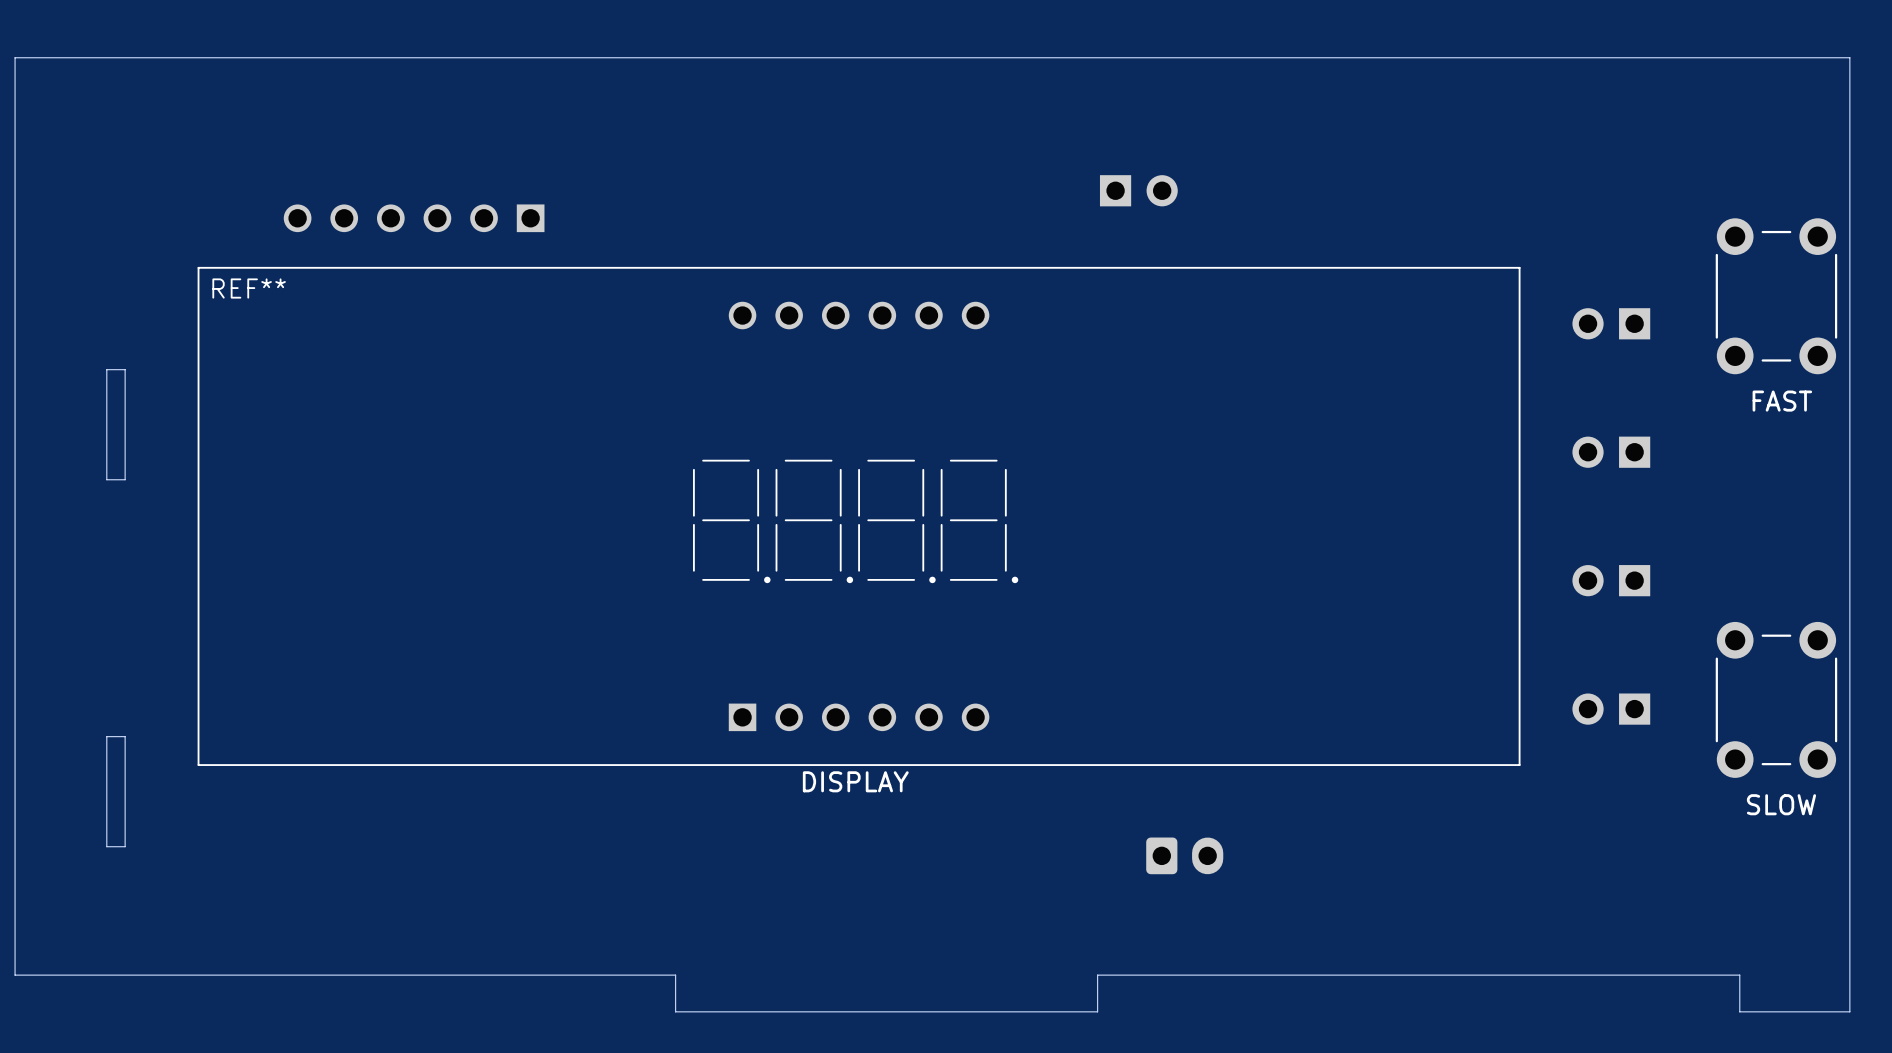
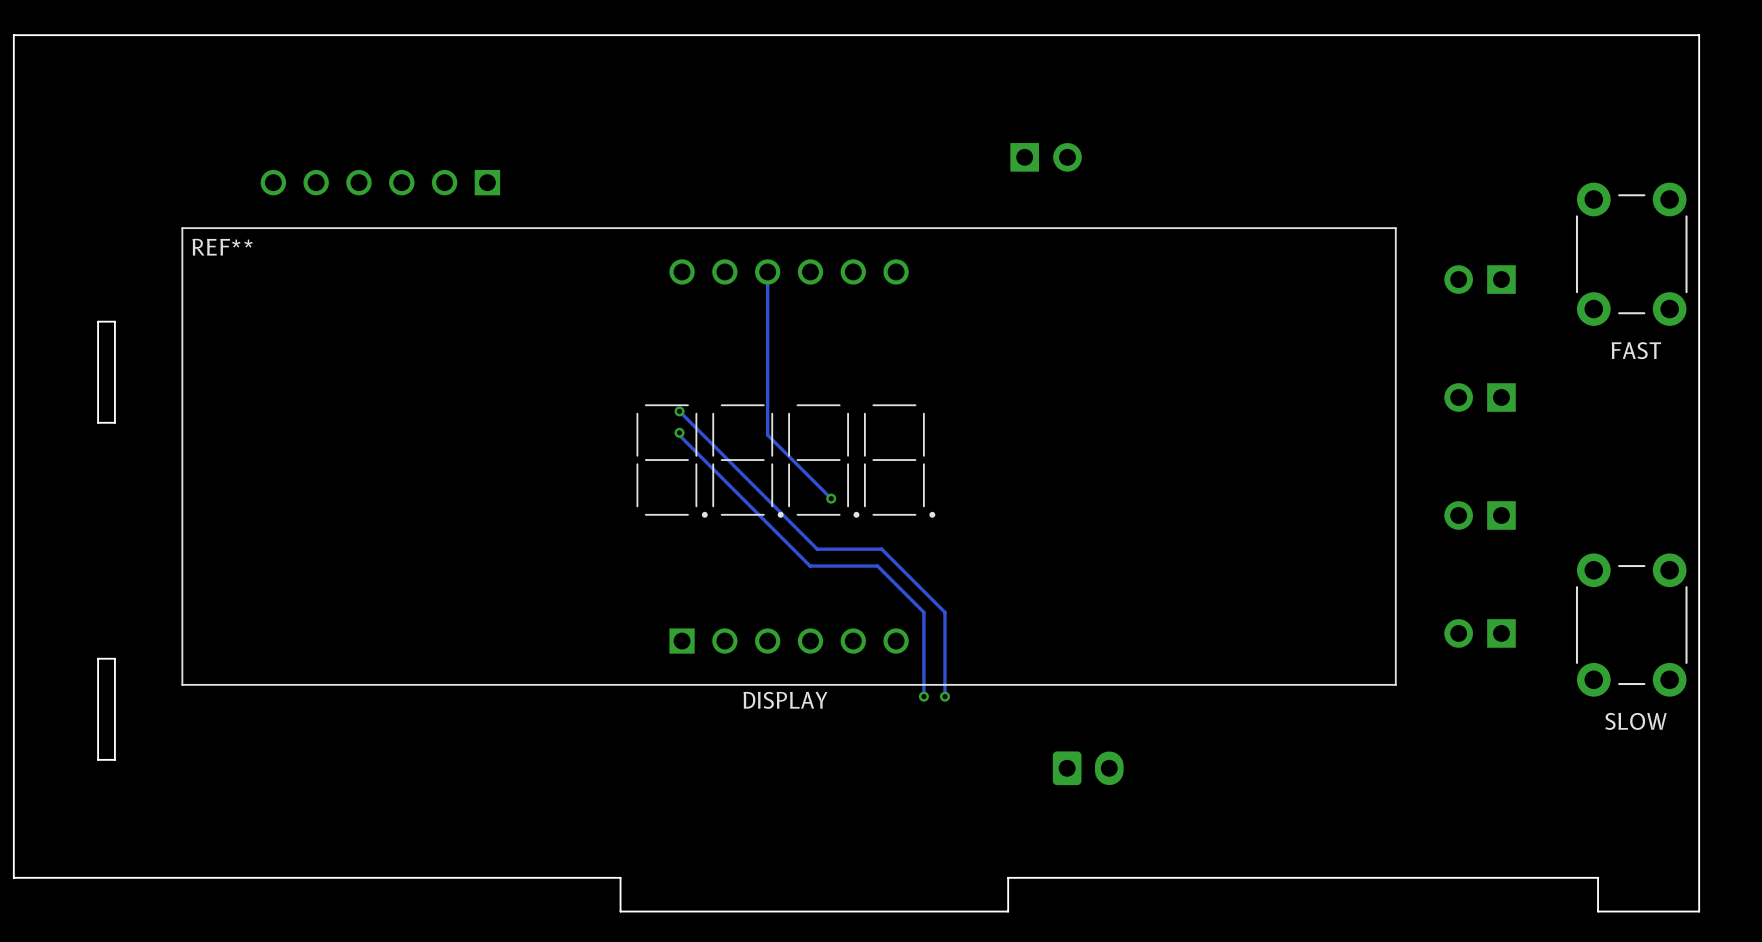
track: none -> (767, 271) (767, 435) (831, 498)
track: none -> (679, 411) (817, 549) (881, 549) (944, 612) (944, 696)
via: none -> (679, 411)
track: none -> (679, 432) (679, 435) (810, 566) (877, 566) (923, 612) (923, 696)
via: none -> (679, 432)
via: none -> (831, 498)
via: none -> (923, 696)
via: none -> (944, 696)

